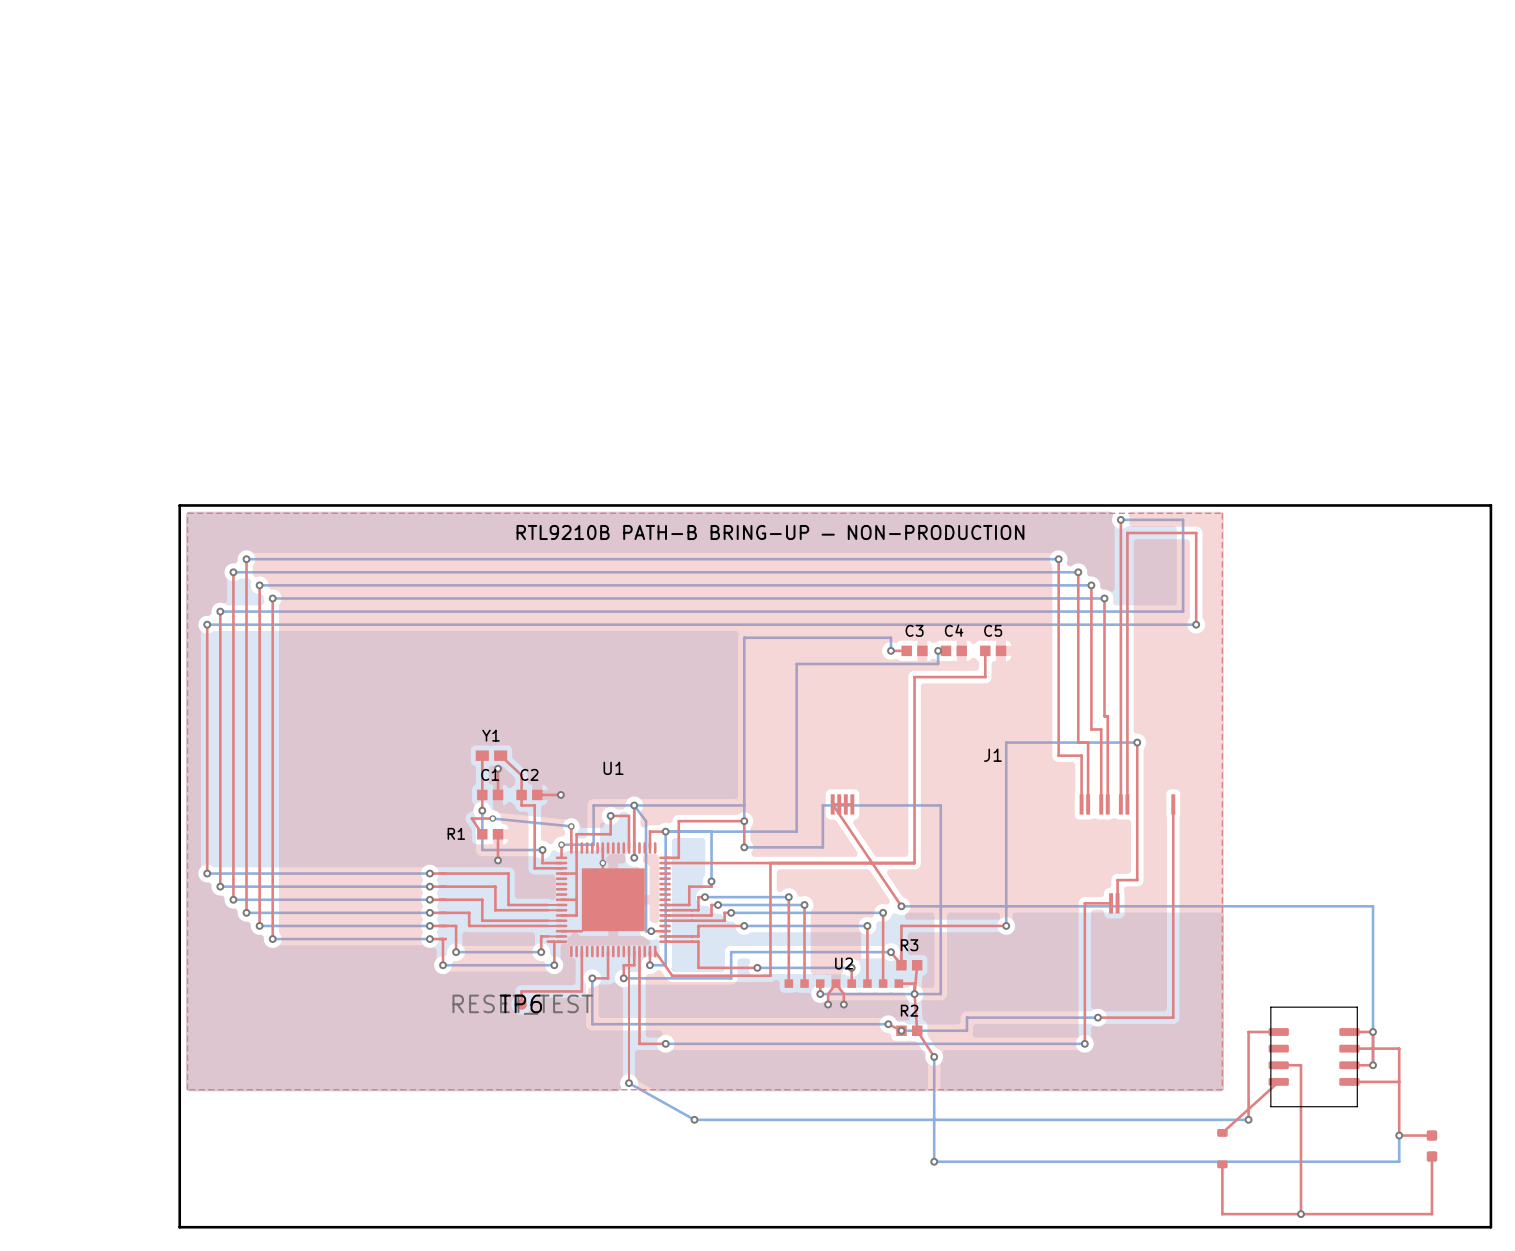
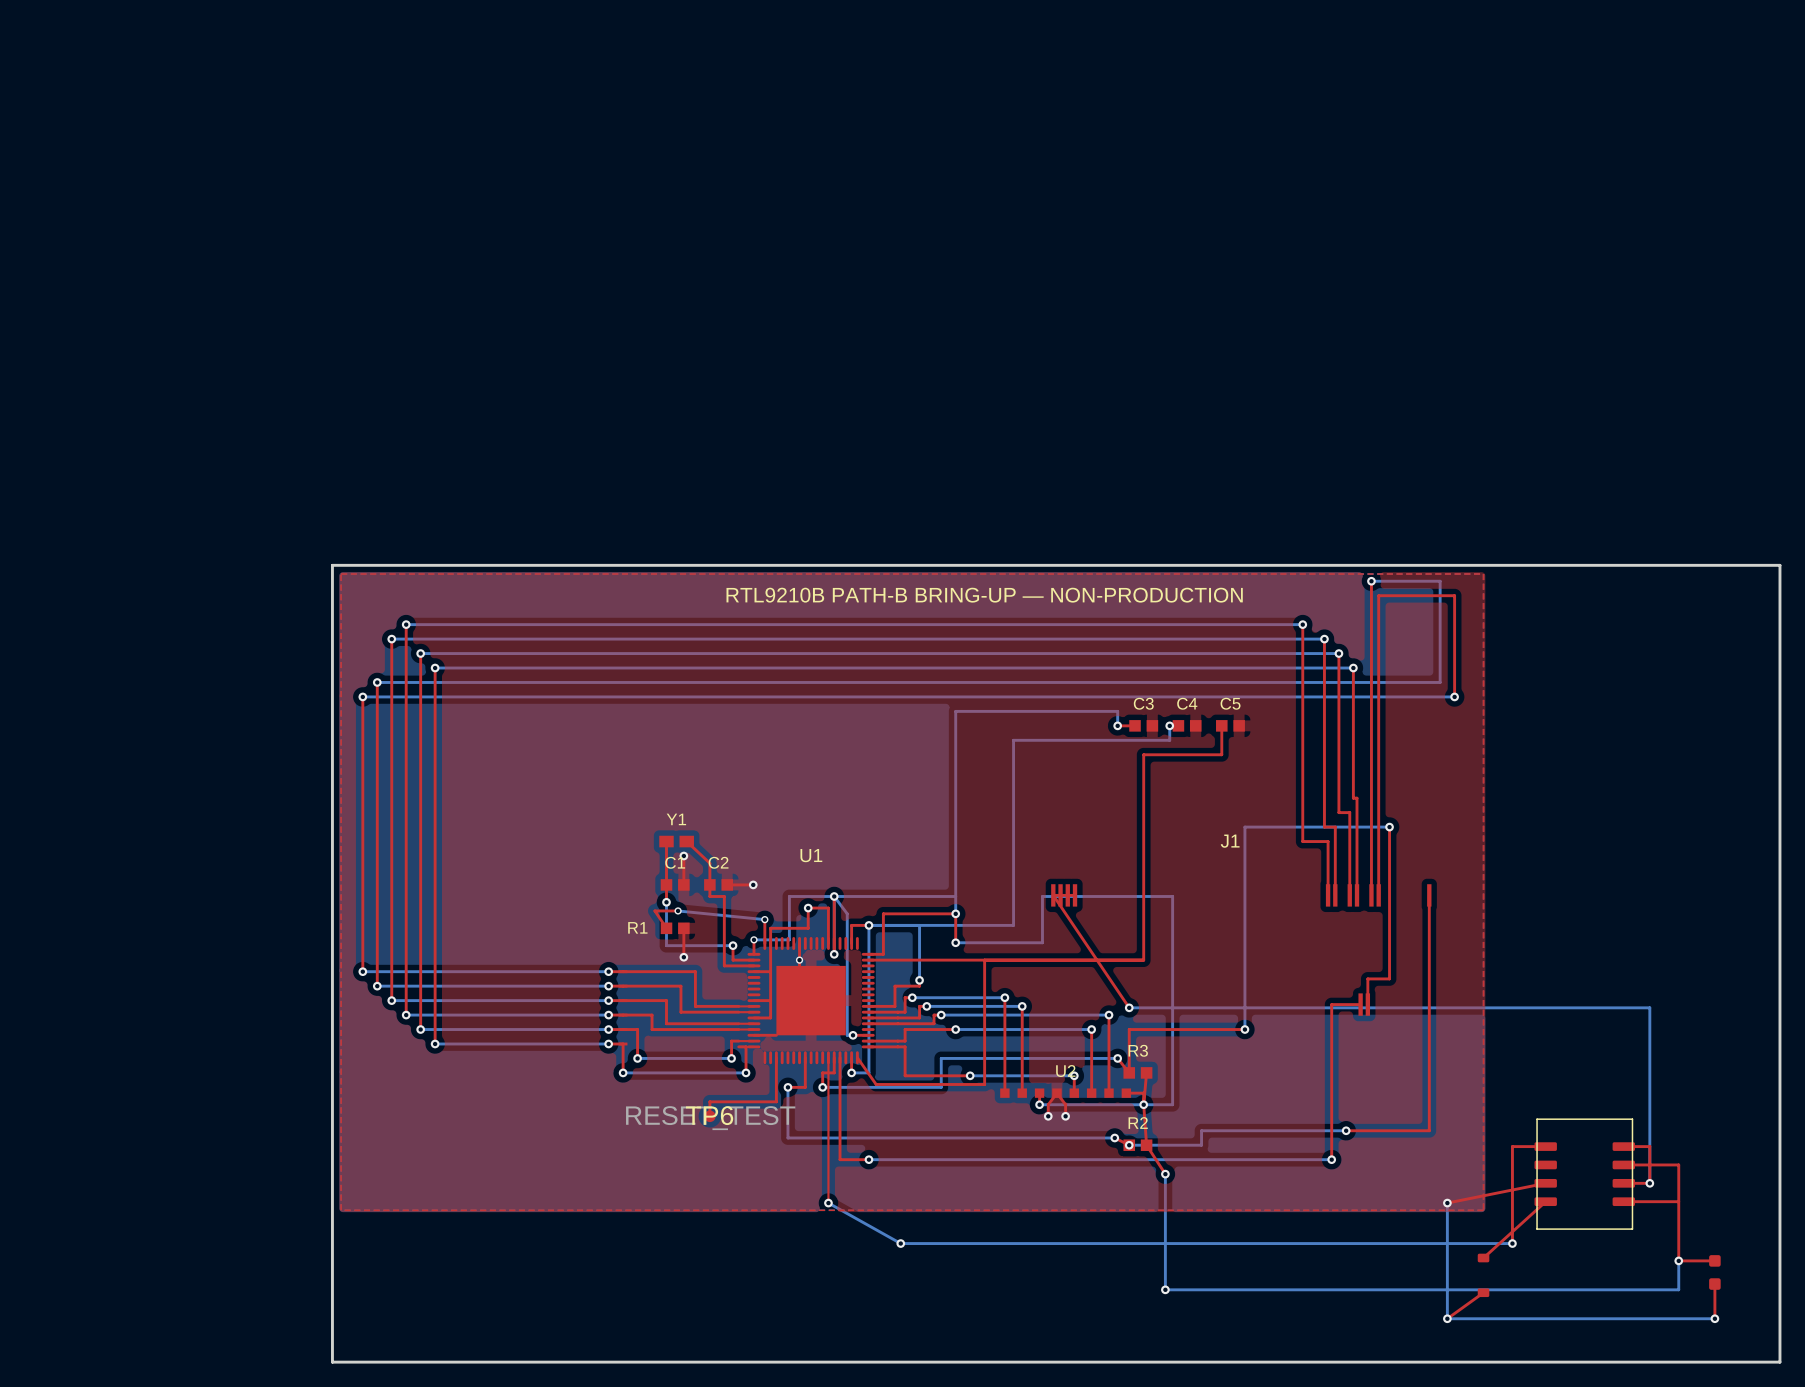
via: (1373, 1031) -> none
top track: (1278, 1065) (1300, 1065) (1300, 1214) -> (1545, 1183) (1447, 1203)
bottom track: none -> (1447, 1203) (1447, 1318) (1714, 1318)
via: none -> (1447, 1203)
top track: (1222, 1164) (1222, 1214) (1431, 1214) (1431, 1187) -> (1483, 1292) (1447, 1318)
via: none -> (1447, 1318)
via: none -> (1714, 1318)
via: (1300, 1214) -> none

